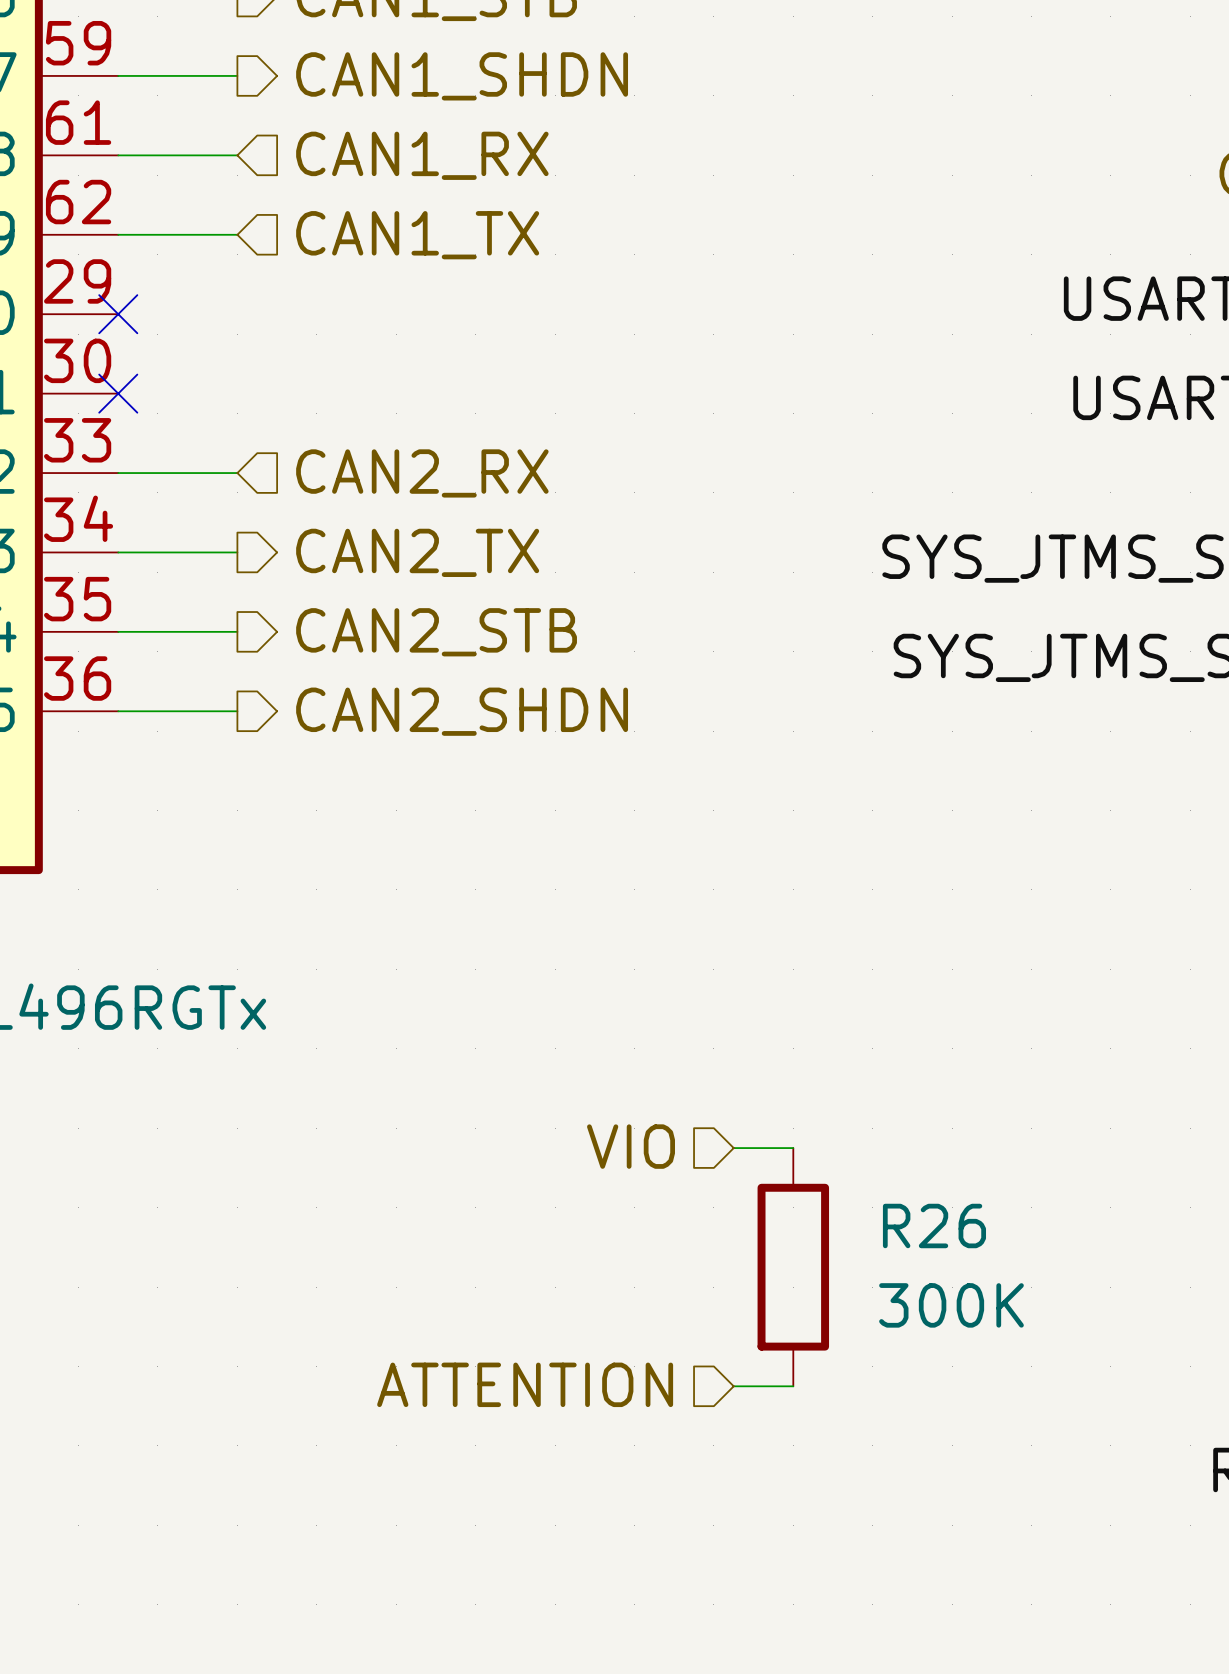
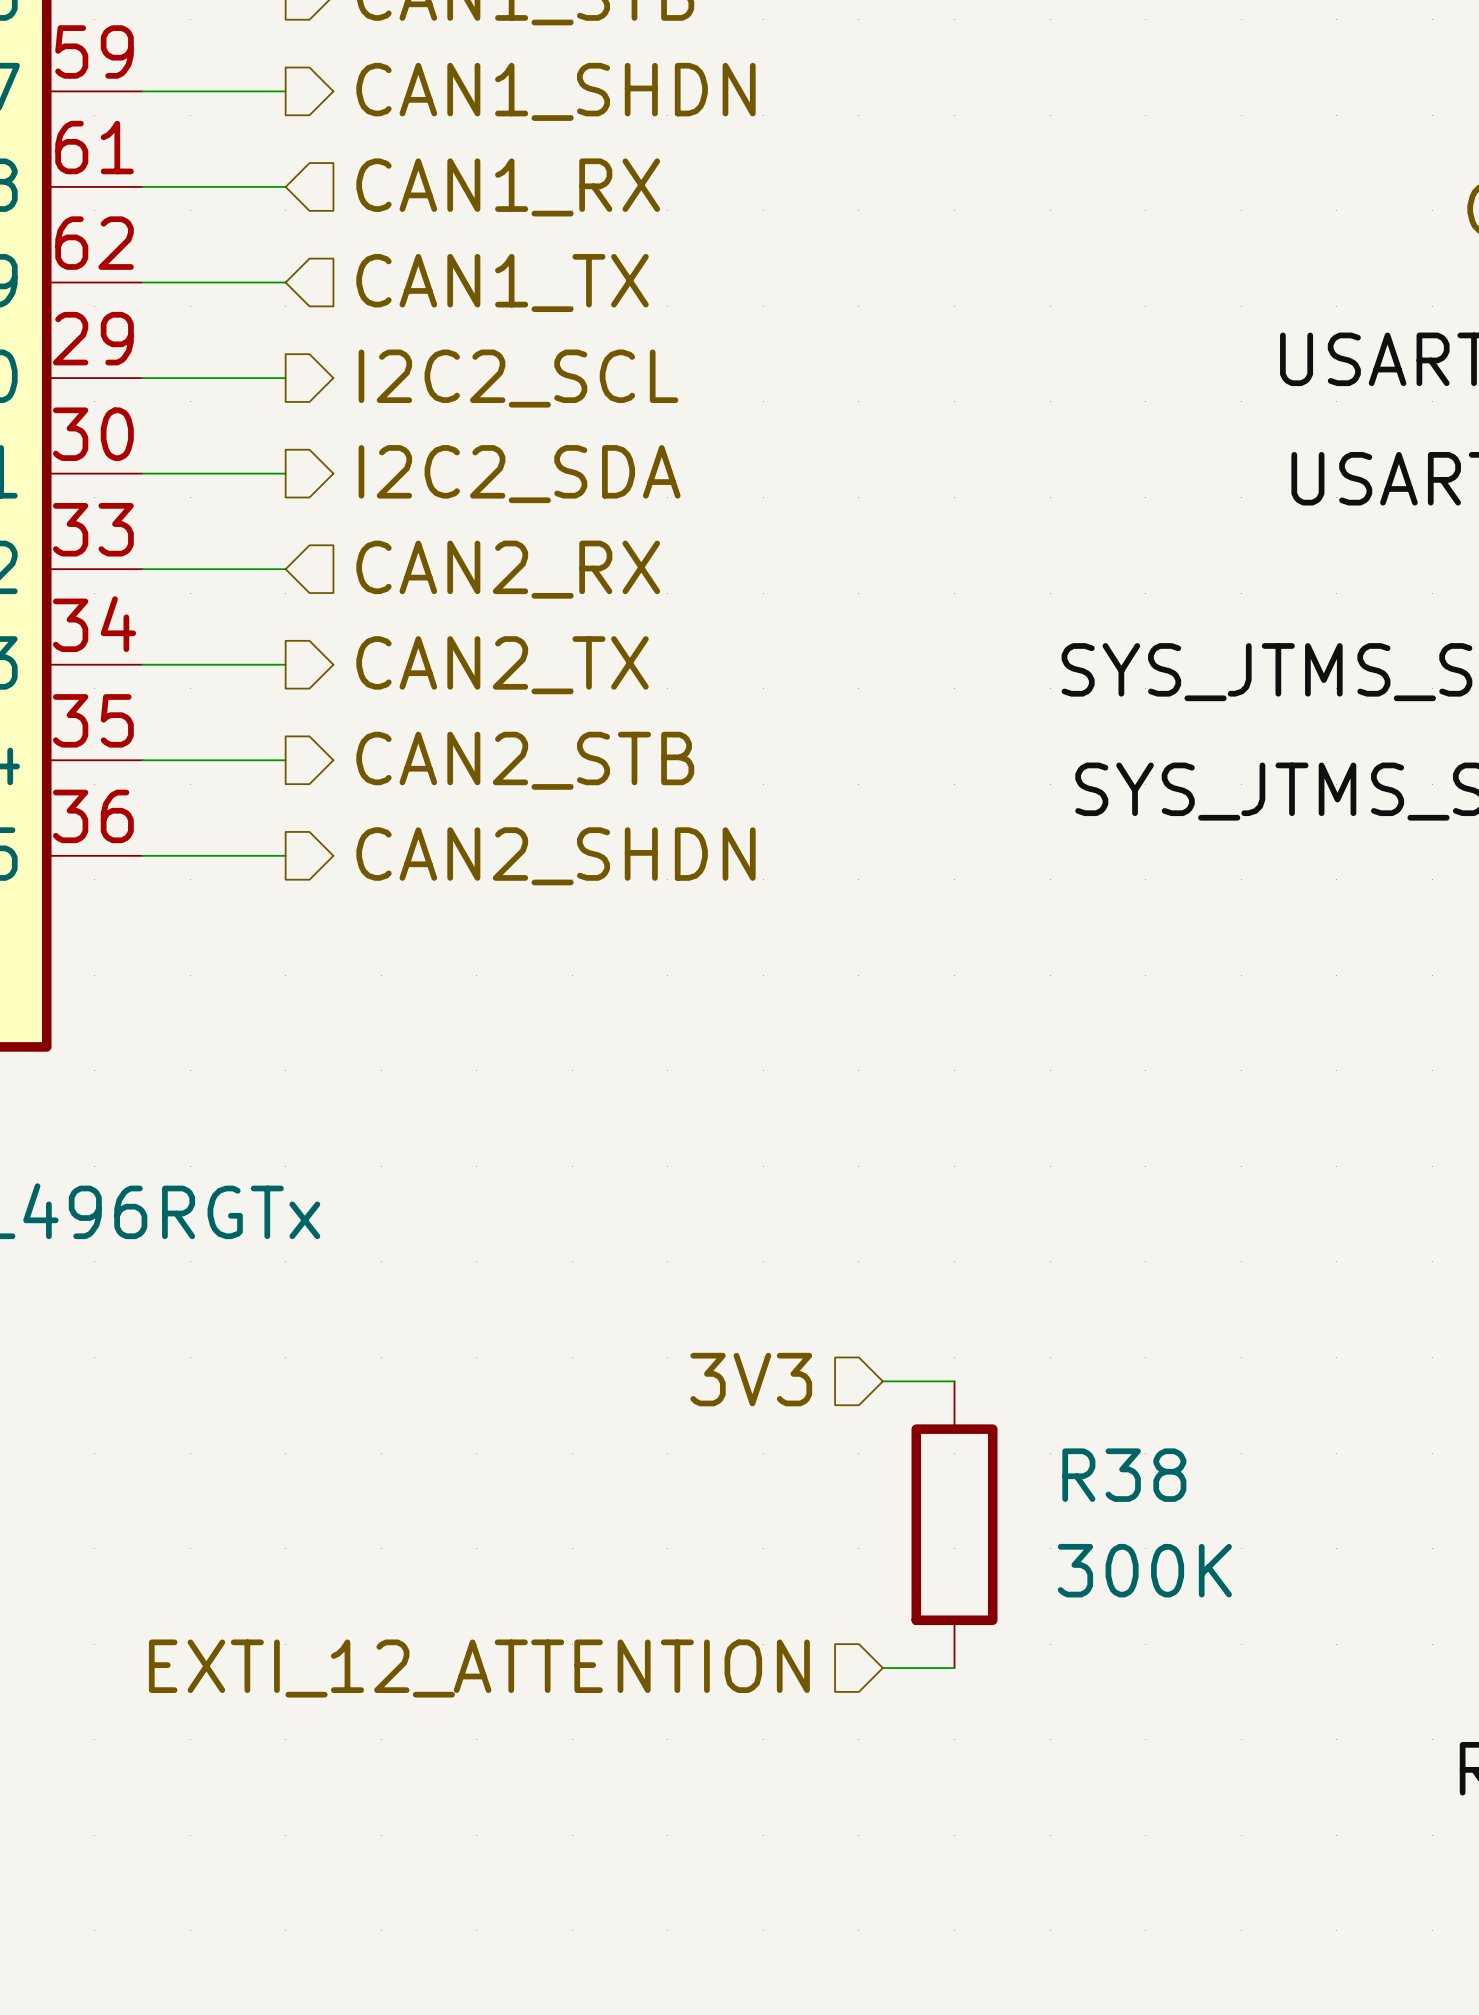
wire: none -> (142, 378) (285, 378)
no-connect mark: (118, 314) -> none
hierarchical label: none -> I2C2_SCL (518, 378)
wire: none -> (142, 473) (285, 473)
no-connect mark: (118, 393) -> none
hierarchical label: none -> I2C2_SDA (519, 474)
hierarchical label: VIO (631, 1146) -> 3V3 (751, 1379)
R26 name: R26 (934, 1225) -> R38 (1124, 1475)
hierarchical label: ATTENTION (525, 1384) -> EXTI_12_ATTENTION (479, 1668)

